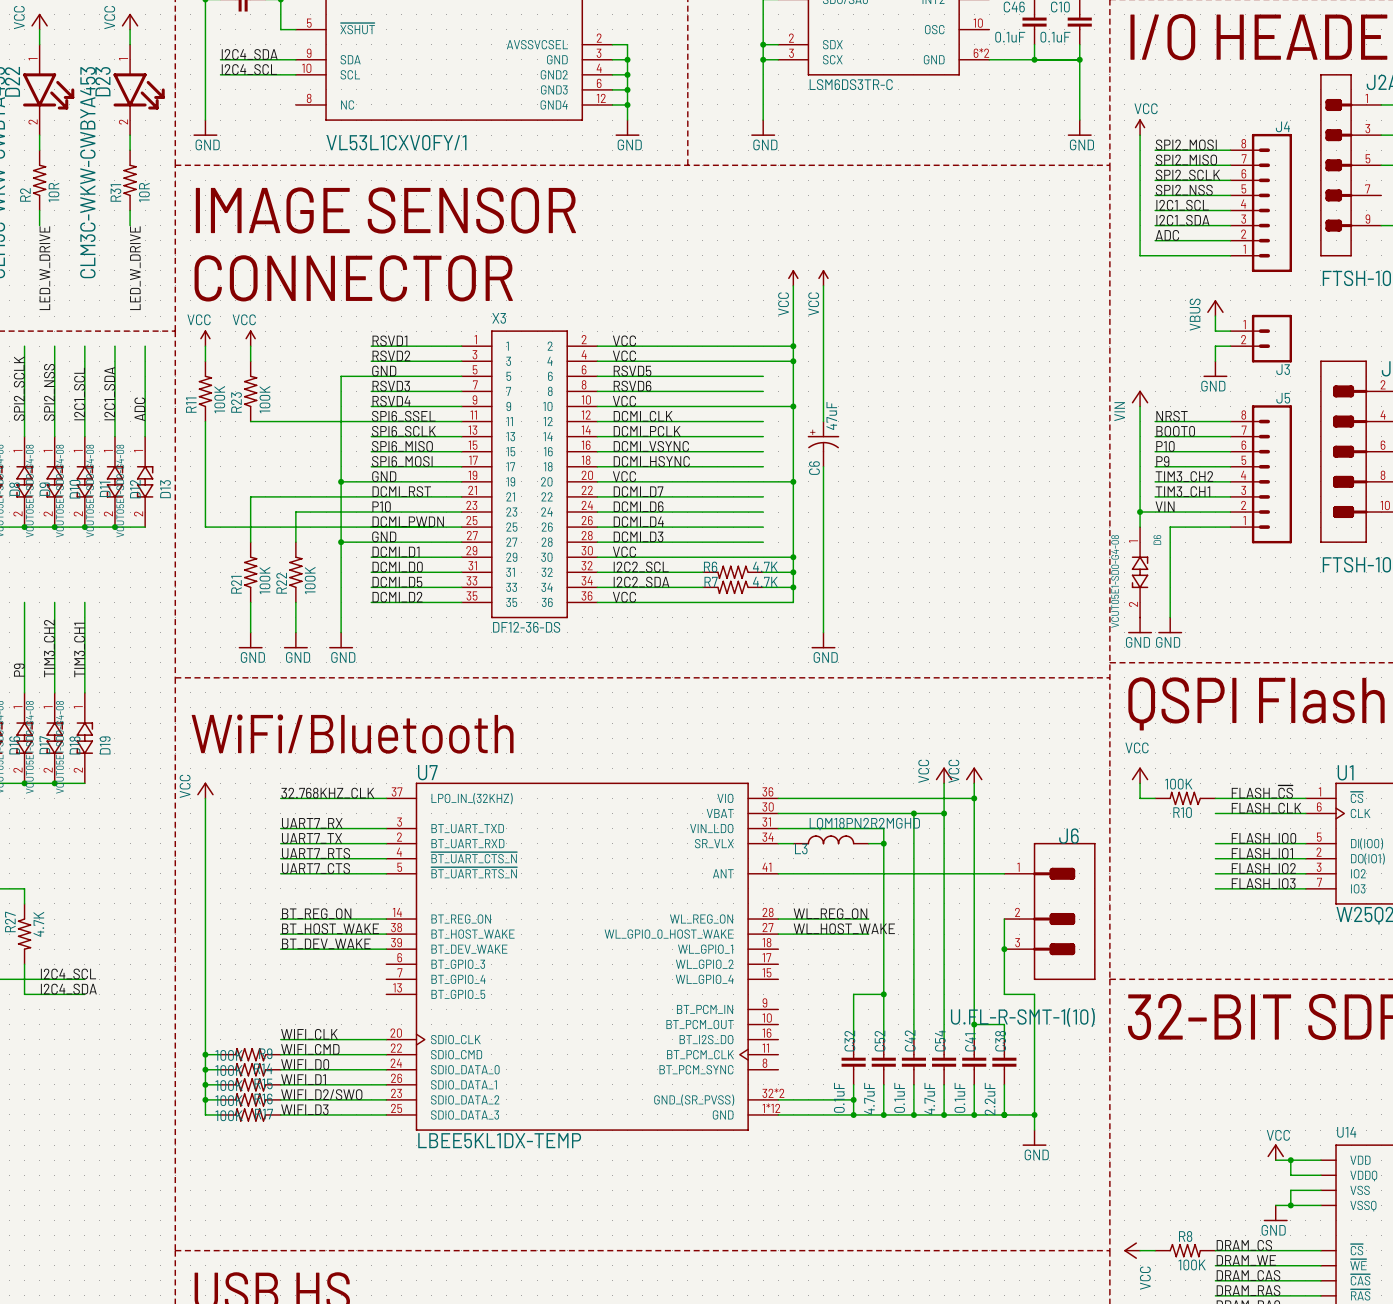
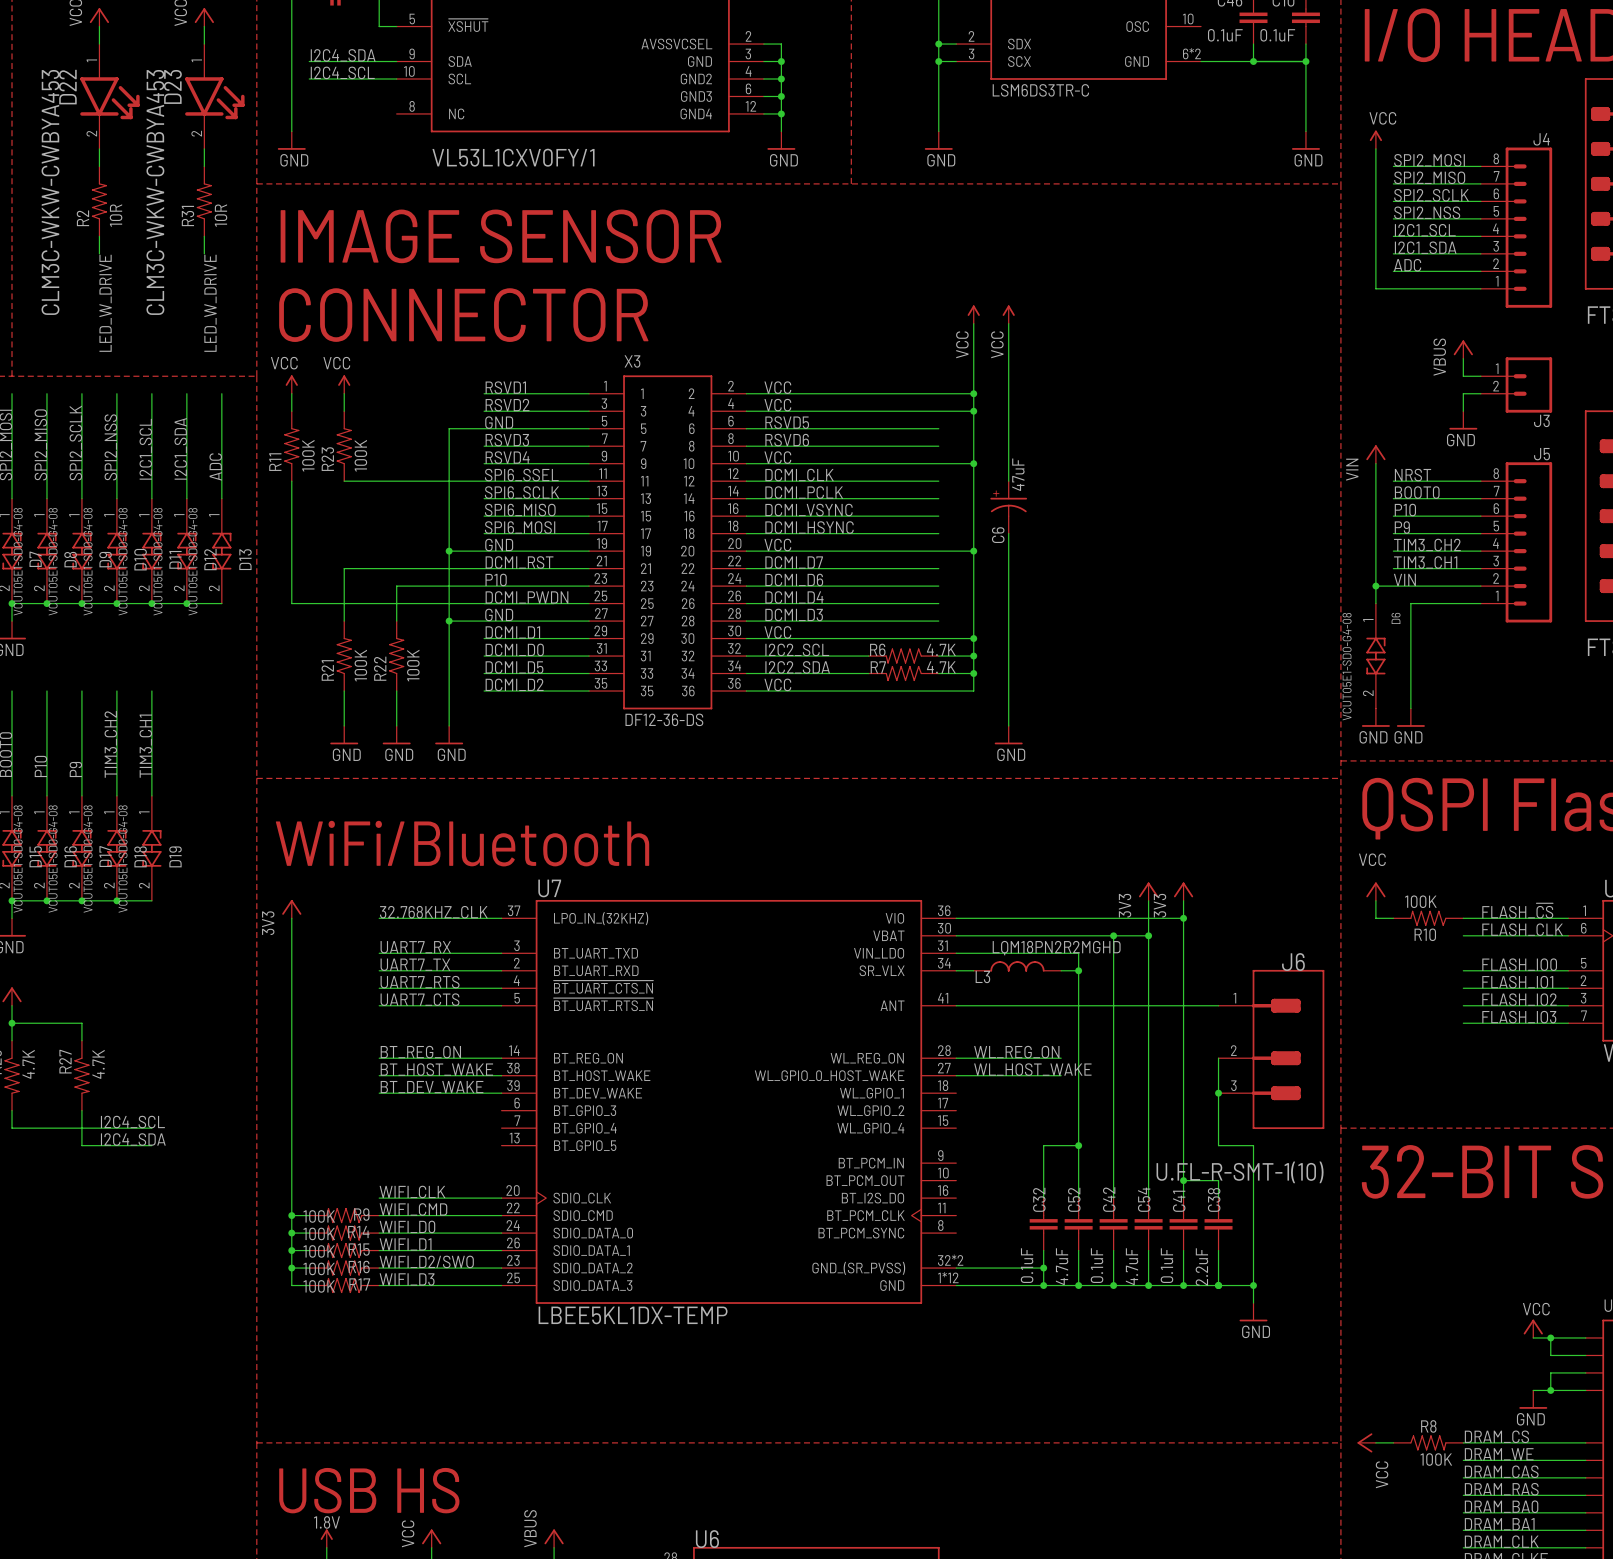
power symbol: VCC (944, 775) -> 3V3 (1148, 891)
power symbol: VCC (974, 775) -> 3V3 (1183, 891)
power symbol: VCC (205, 790) -> 3V3 (291, 909)

